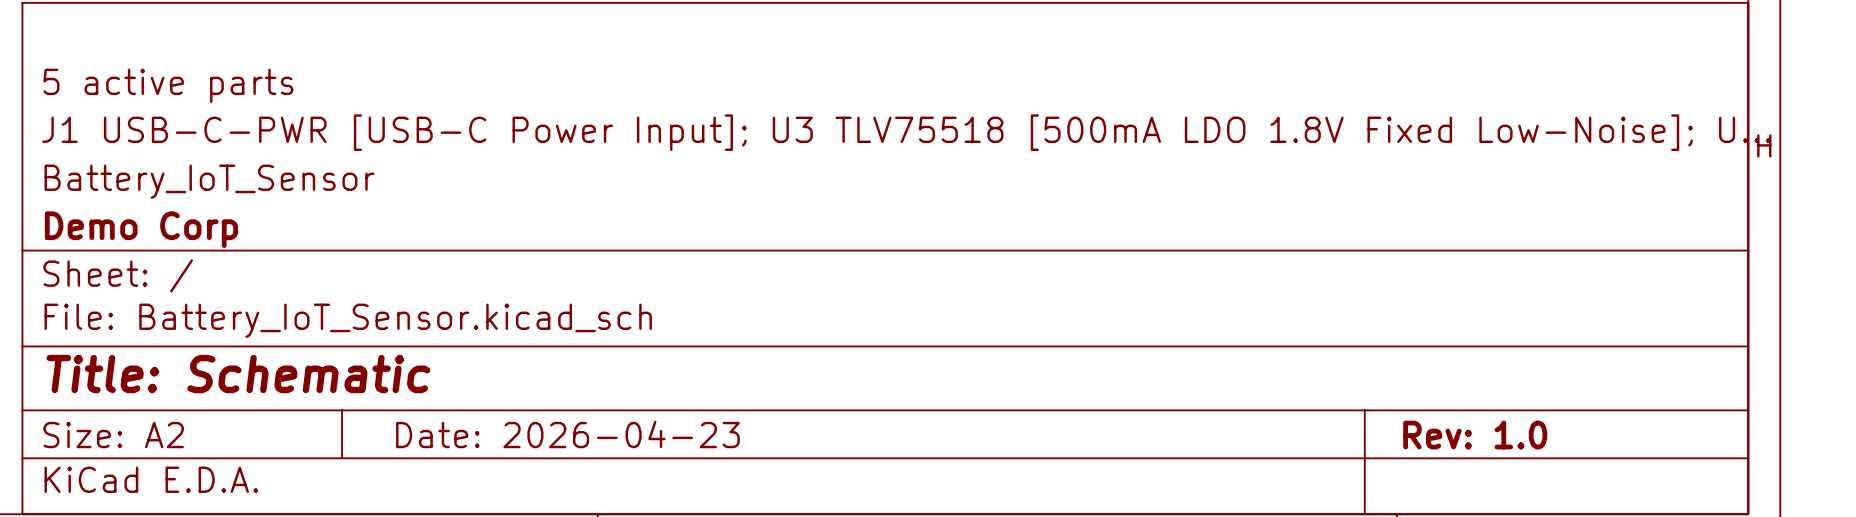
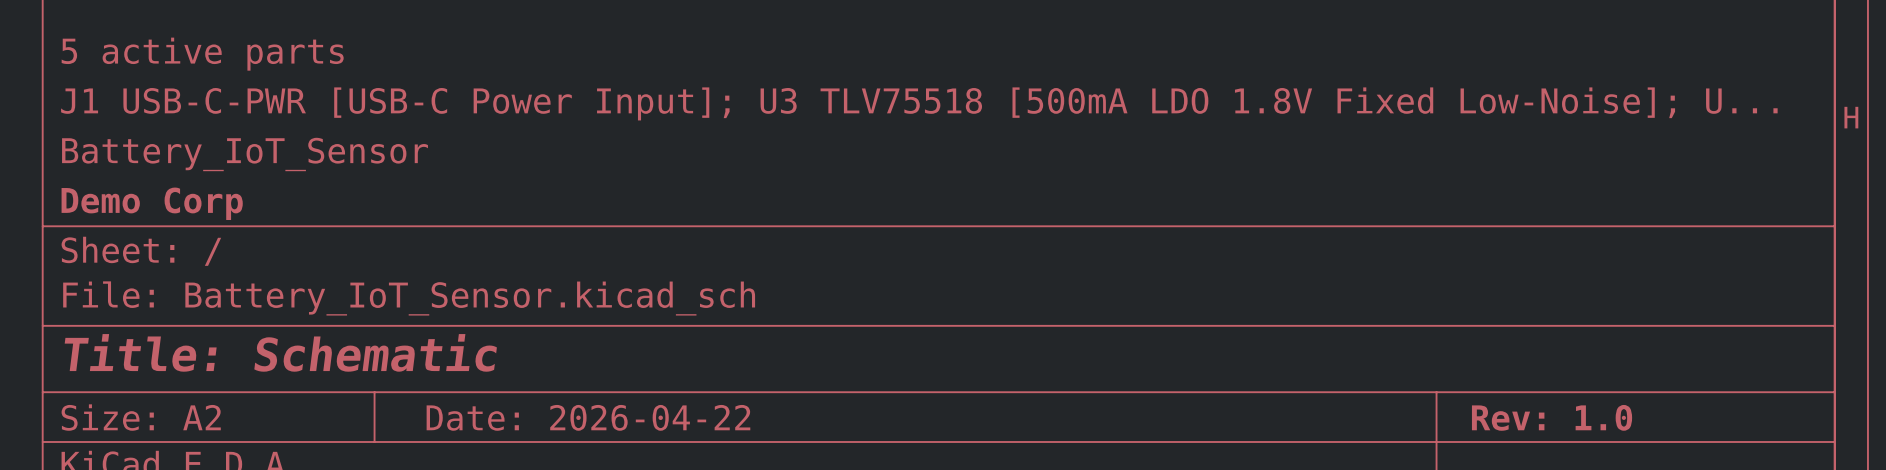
title block: Date: 2026-04-23 (567, 434) -> Date: 2026-04-22 (588, 417)

